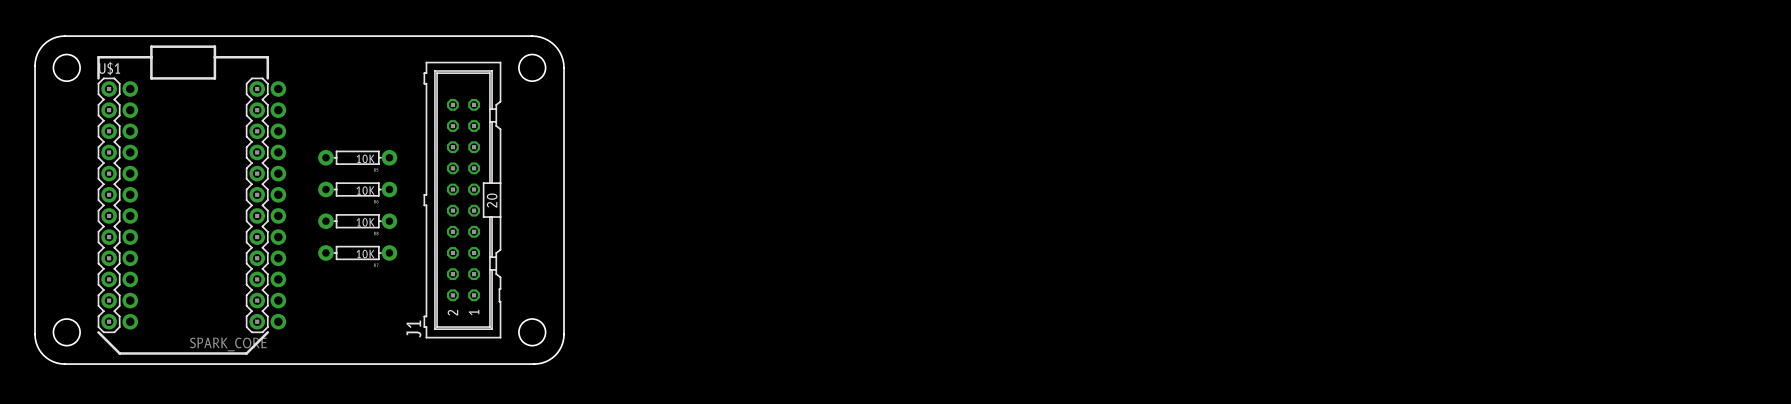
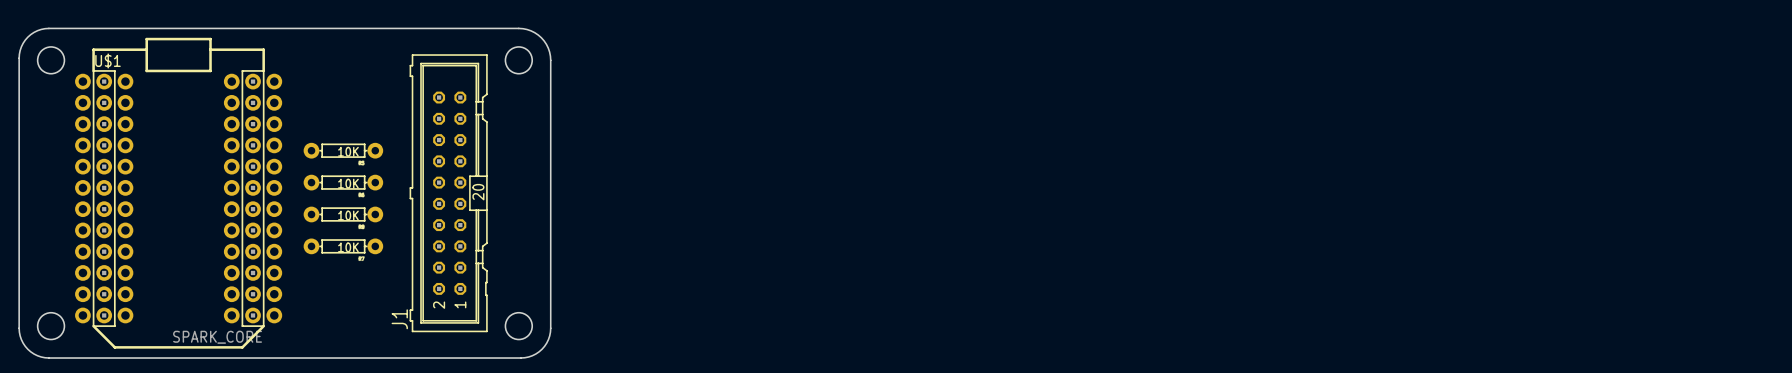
U$1 footprint: [97, 45, 287, 355] -> [75, 37, 283, 349]

